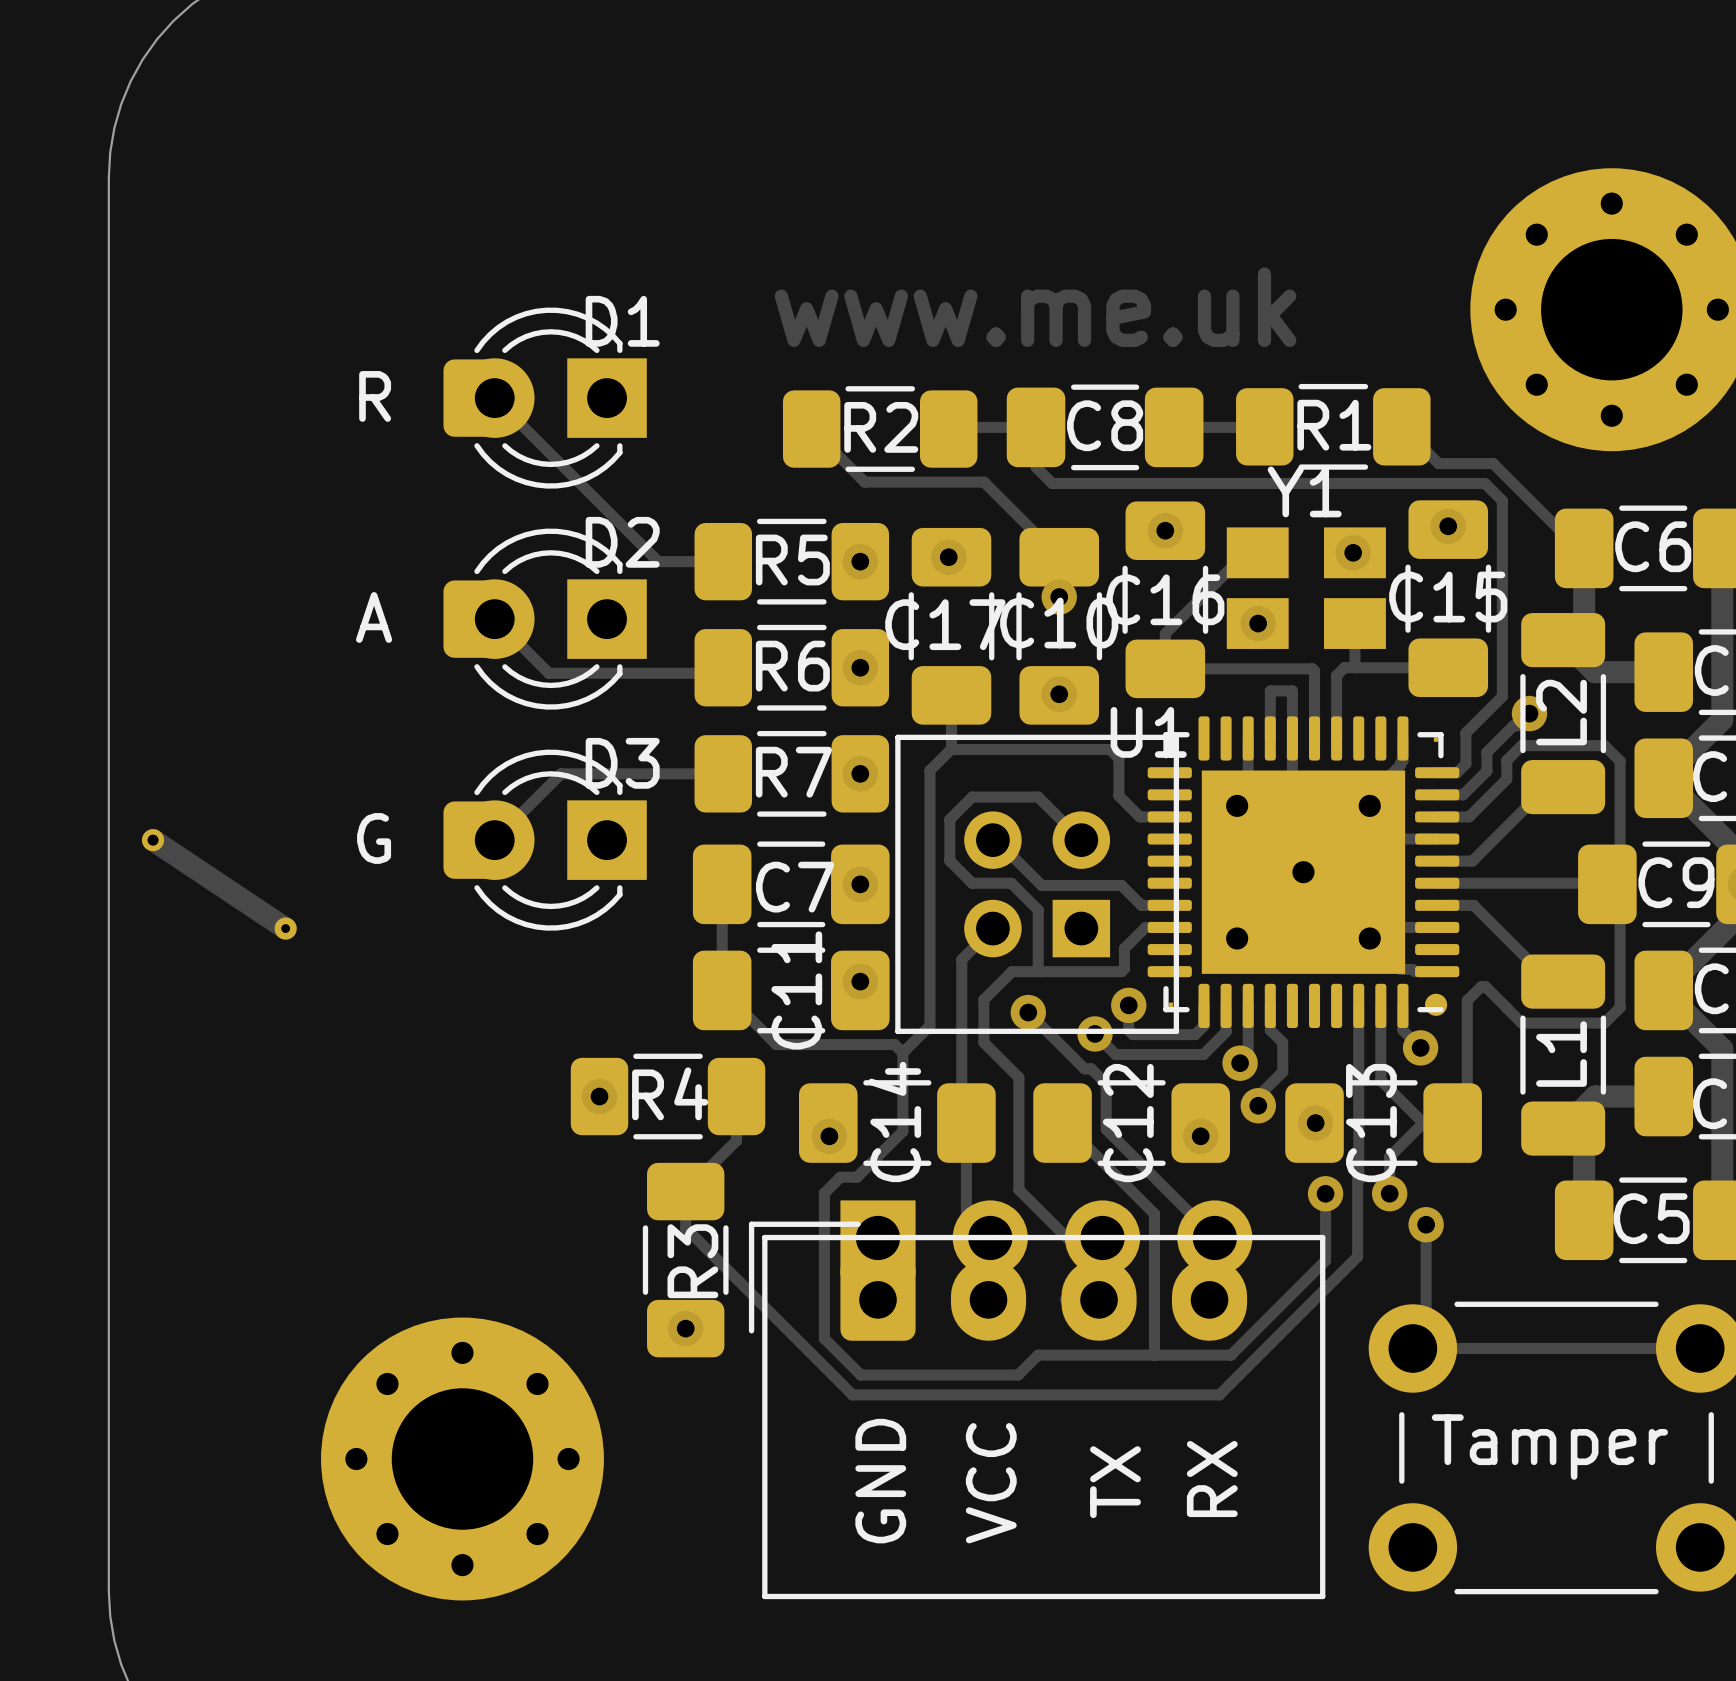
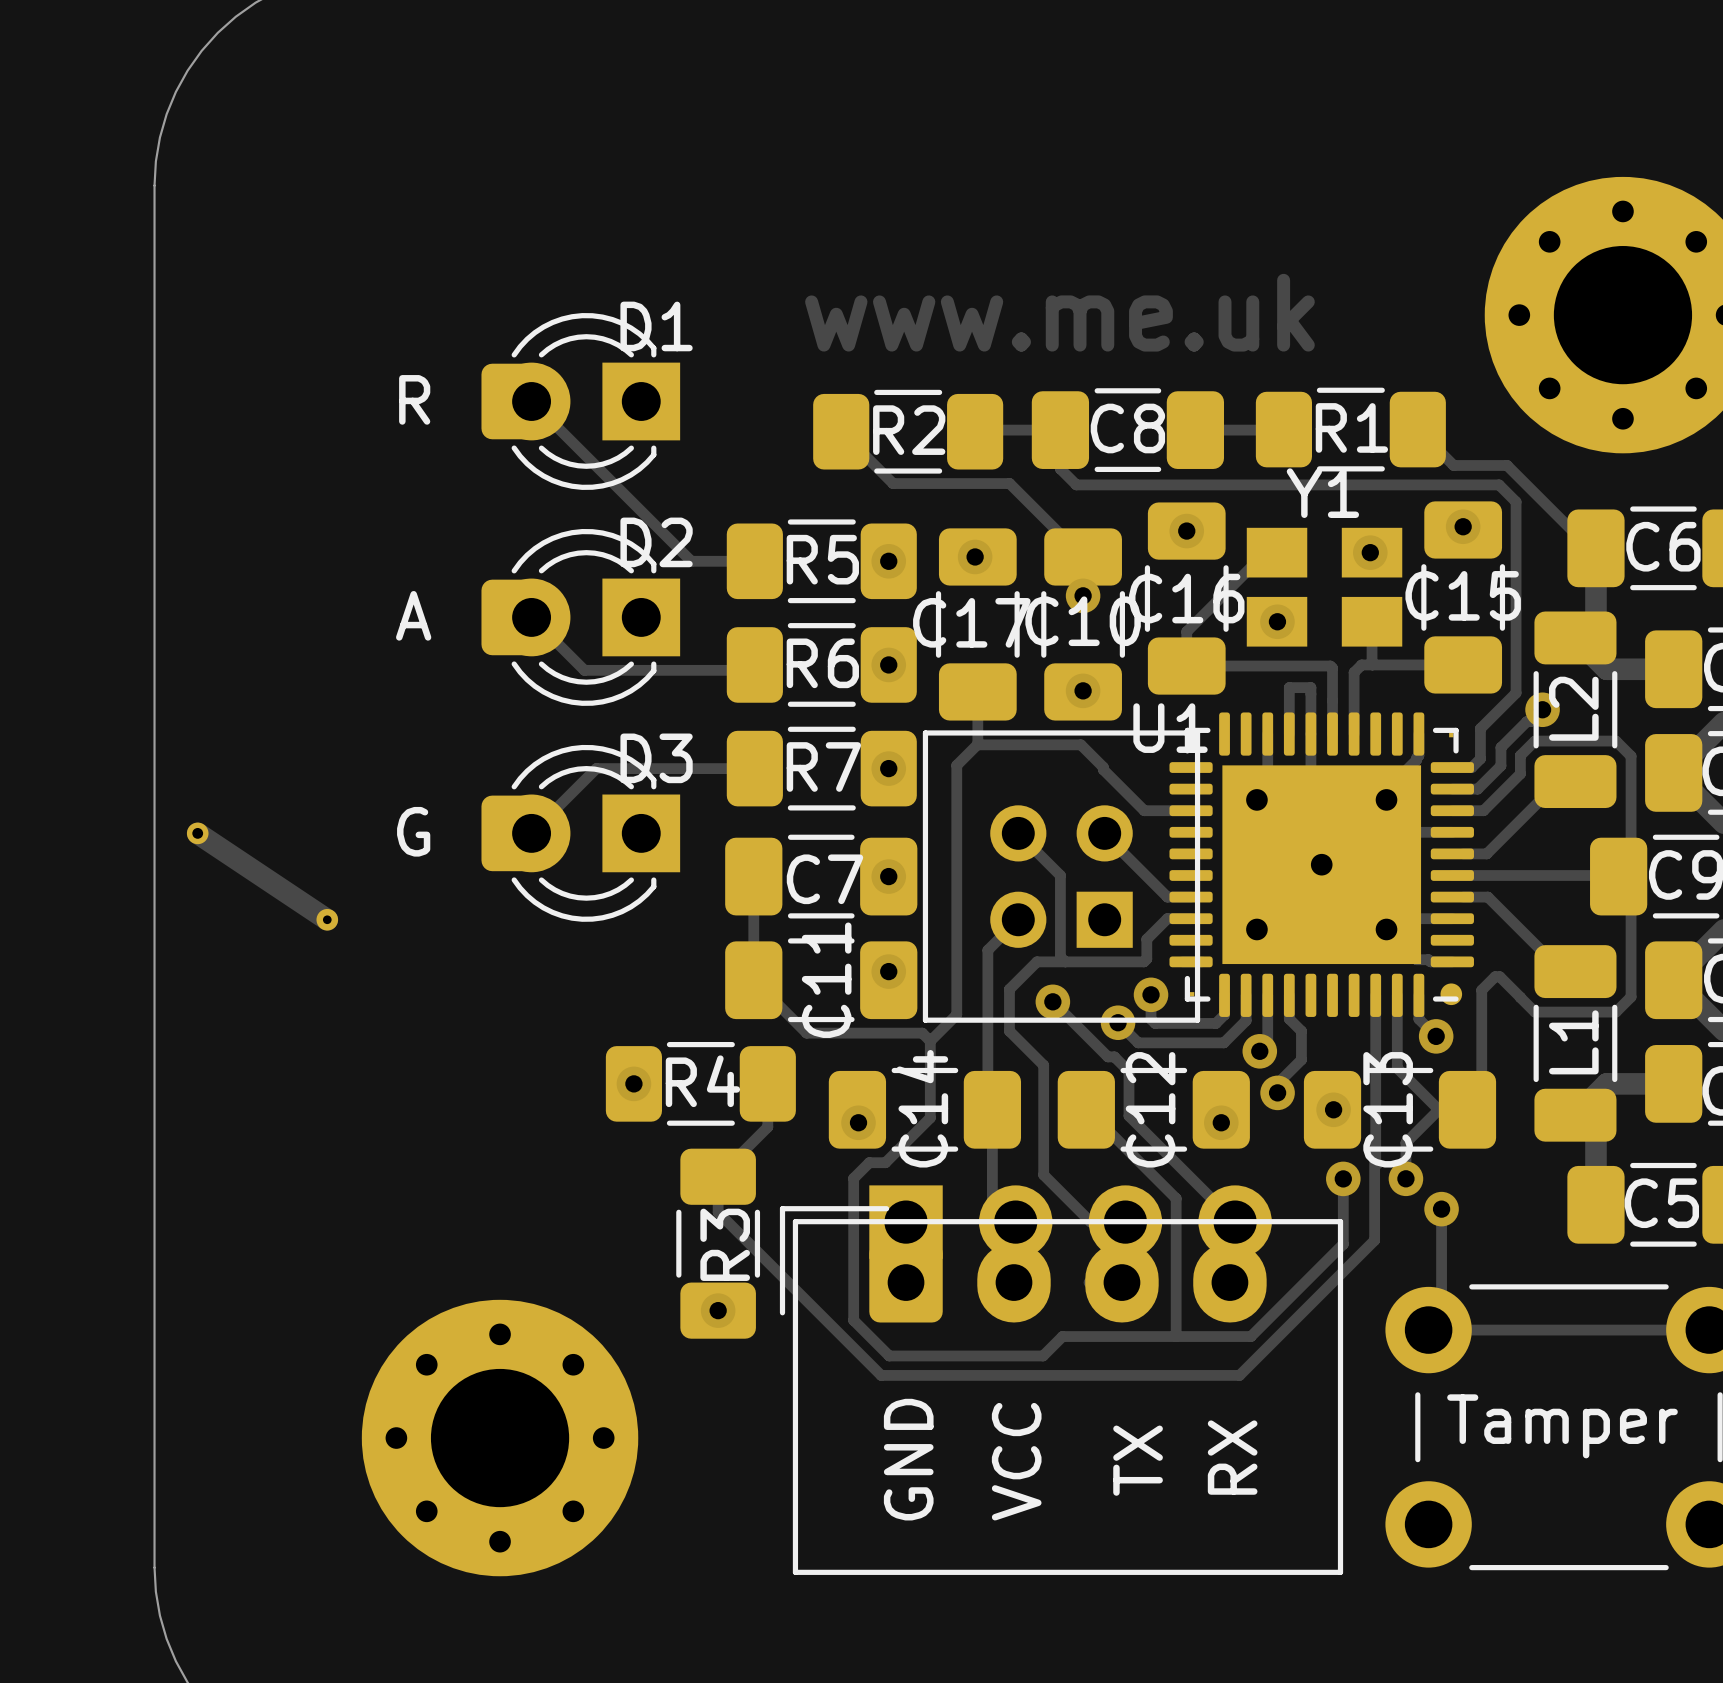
track: (1057, 749) (1110, 749) (1118, 758) (1118, 795) (1139, 816) -> (1080, 744) (1144, 810) (1161, 810)
track: (992, 840) (996, 840) (1041, 885) (1121, 885) (1141, 905) (1145, 905) -> (1104, 833) (1167, 897)
track: (1081, 840) (1038, 797) (972, 797) (949, 819) (949, 860) (972, 883) (1011, 883) (1038, 910) (1038, 968) -> (1018, 833) (1060, 875) (1060, 956) (1062, 959)

